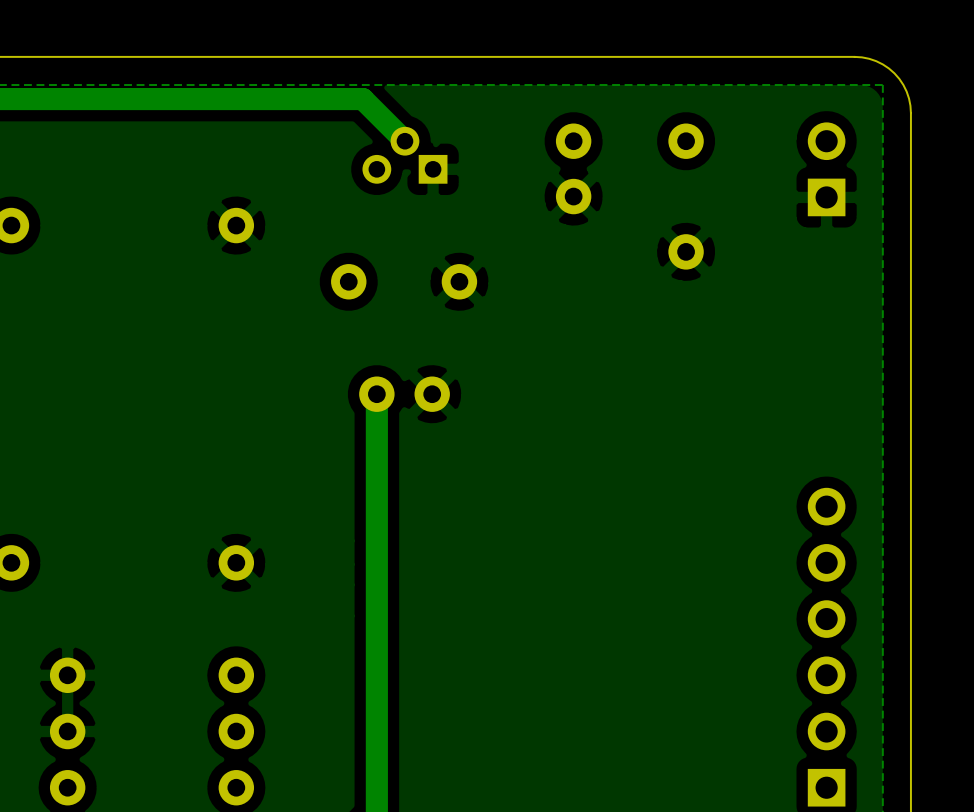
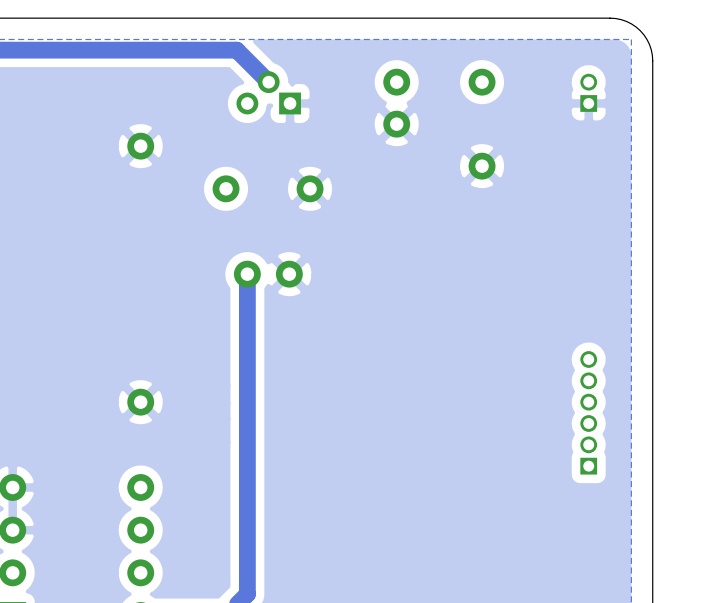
part footprint: [807, 122, 846, 217] -> [580, 73, 598, 112]
part: none -> (588, 412)
part: (826, 647) -> none

